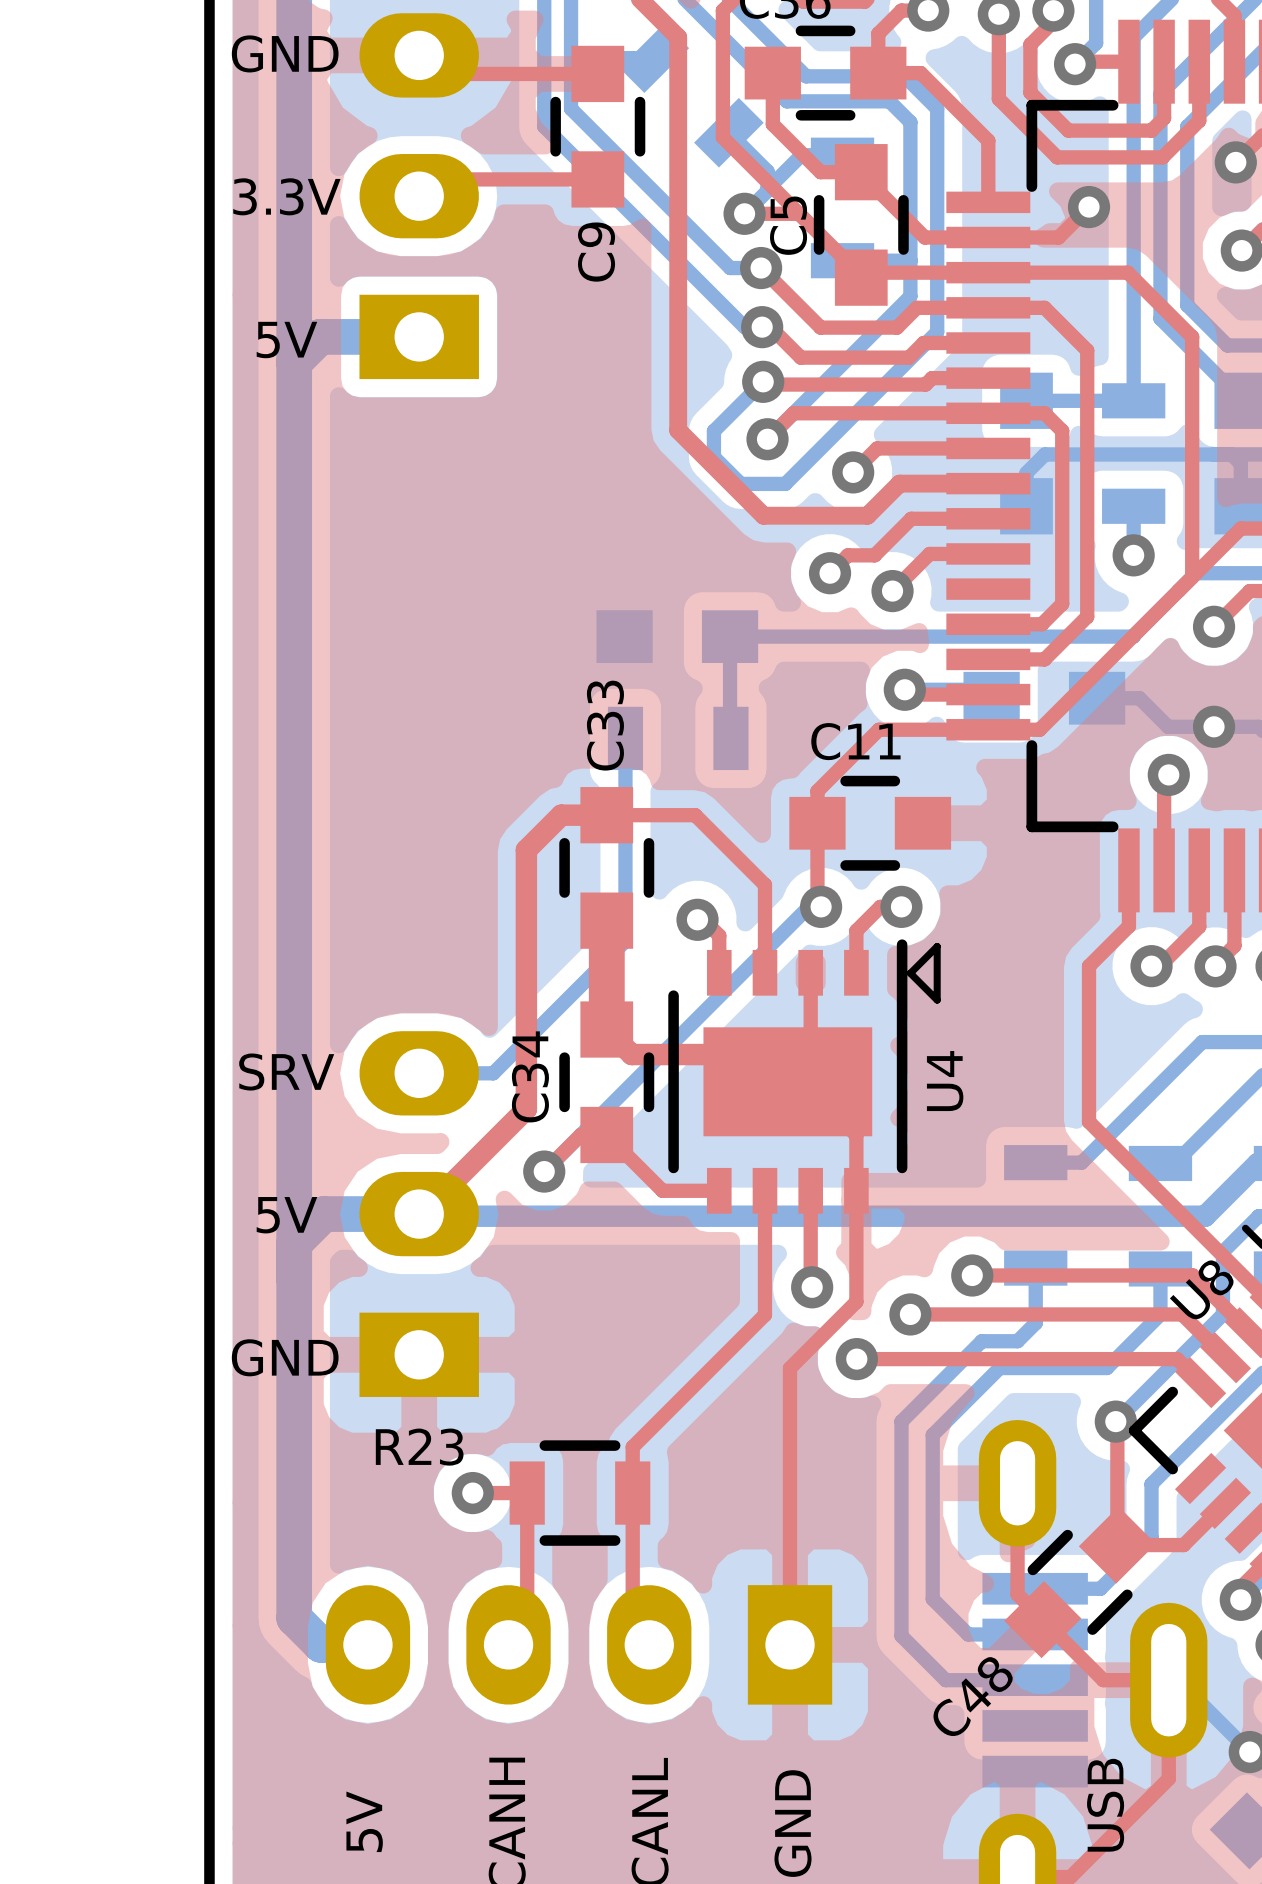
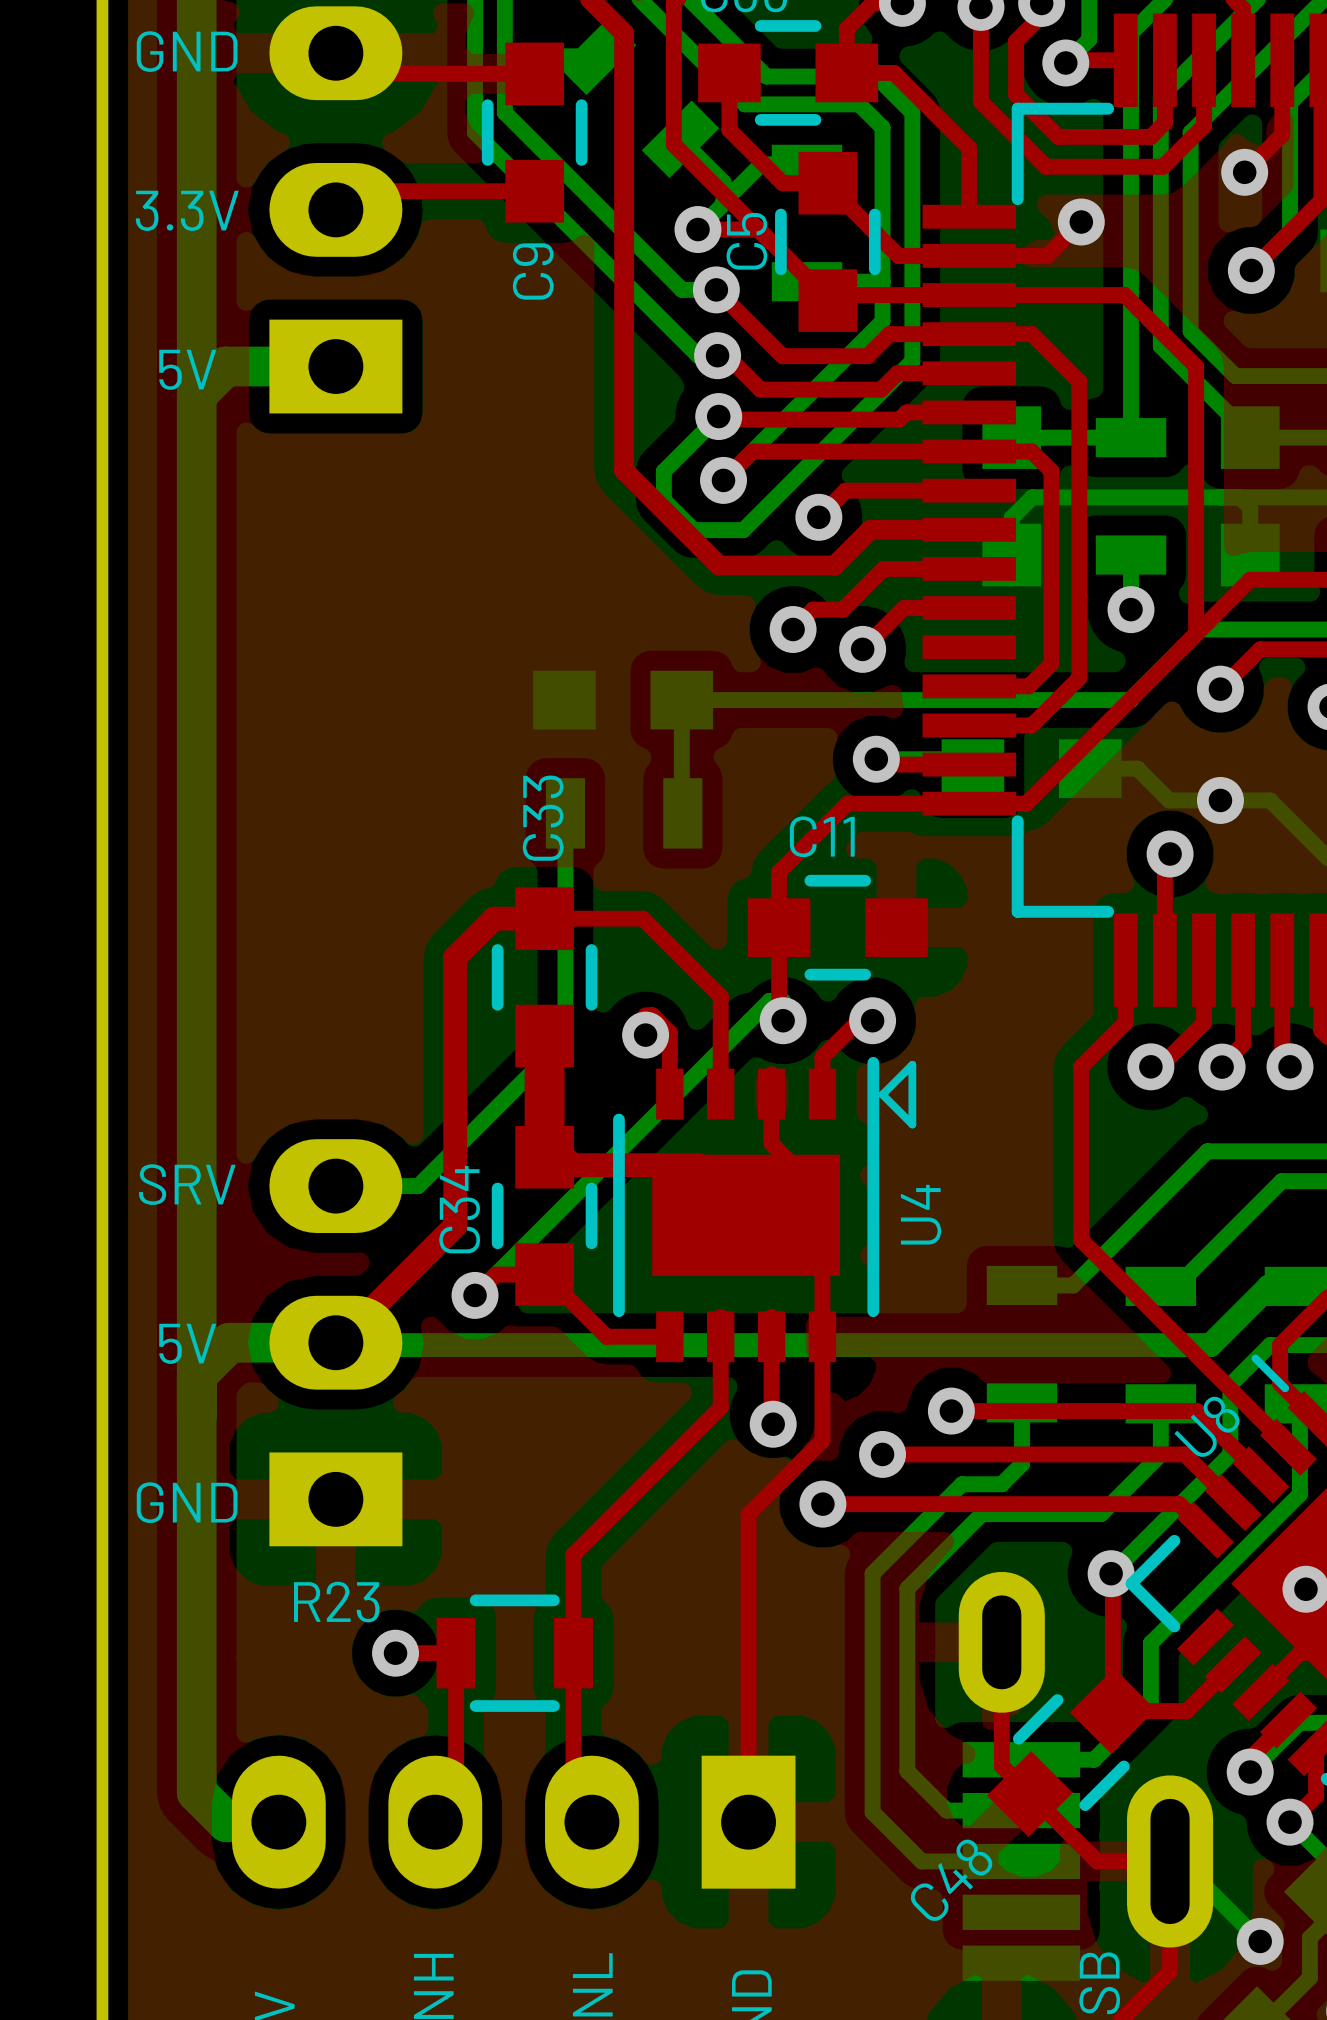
C11 position: (870, 823) -> (837, 927)
top track: (526, 867) (526, 850) (561, 815) (695, 815) (764, 884) (764, 902) -> (455, 957) (493, 918) (643, 918) (720, 996)
C33 position: (606, 867) -> (544, 977)
via position: (821, 906) -> (783, 1020)
top track: (901, 906) (880, 906) (856, 930) (856, 957) -> (872, 1020) (859, 1020) (822, 1057)
via position: (901, 906) -> (872, 1020)
via position: (697, 919) -> (645, 1035)
line: (937, 964) (937, 946) (910, 973) (937, 1000) -> (912, 1064) (882, 1094) (912, 1124) (912, 1104)
U4 position: (787, 1076) -> (746, 1209)
C34 position: (606, 1082) -> (544, 1215)
top track: (562, 1152) (580, 1134) (606, 1134) (662, 1190) (719, 1190) -> (495, 1274) (544, 1274) (606, 1336) (669, 1336)
top track: (764, 1272) (764, 1314) (632, 1447) -> (720, 1407) (573, 1554) (573, 1602)

